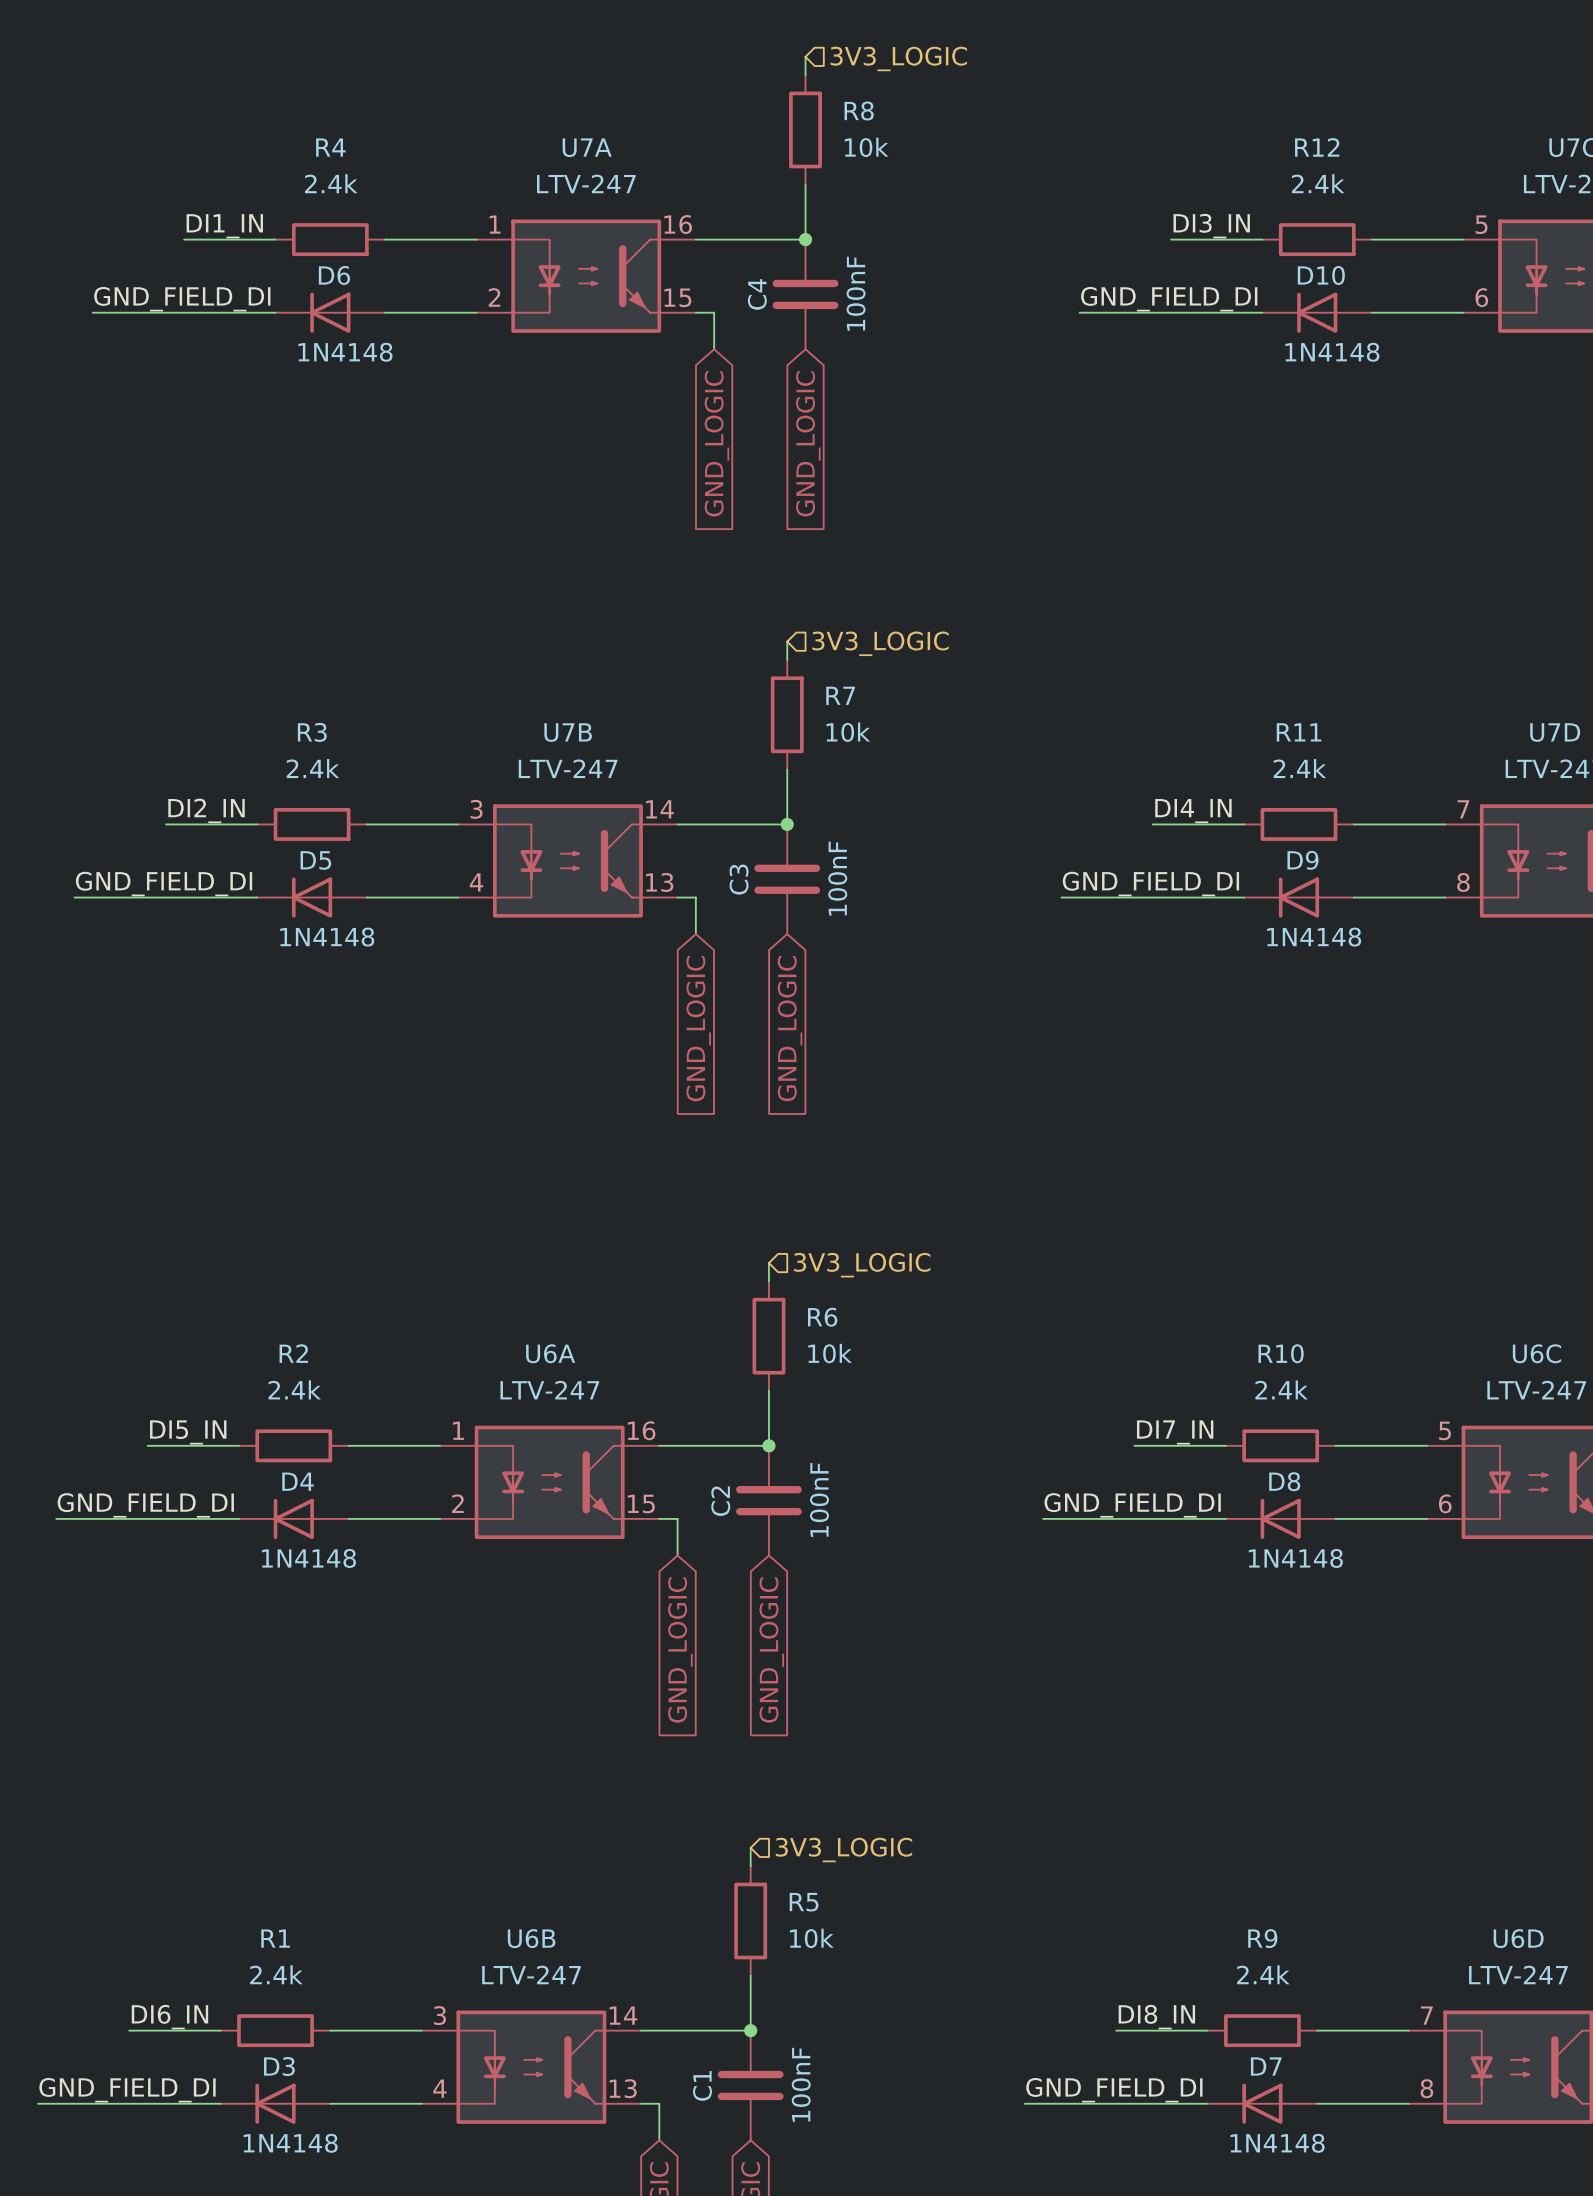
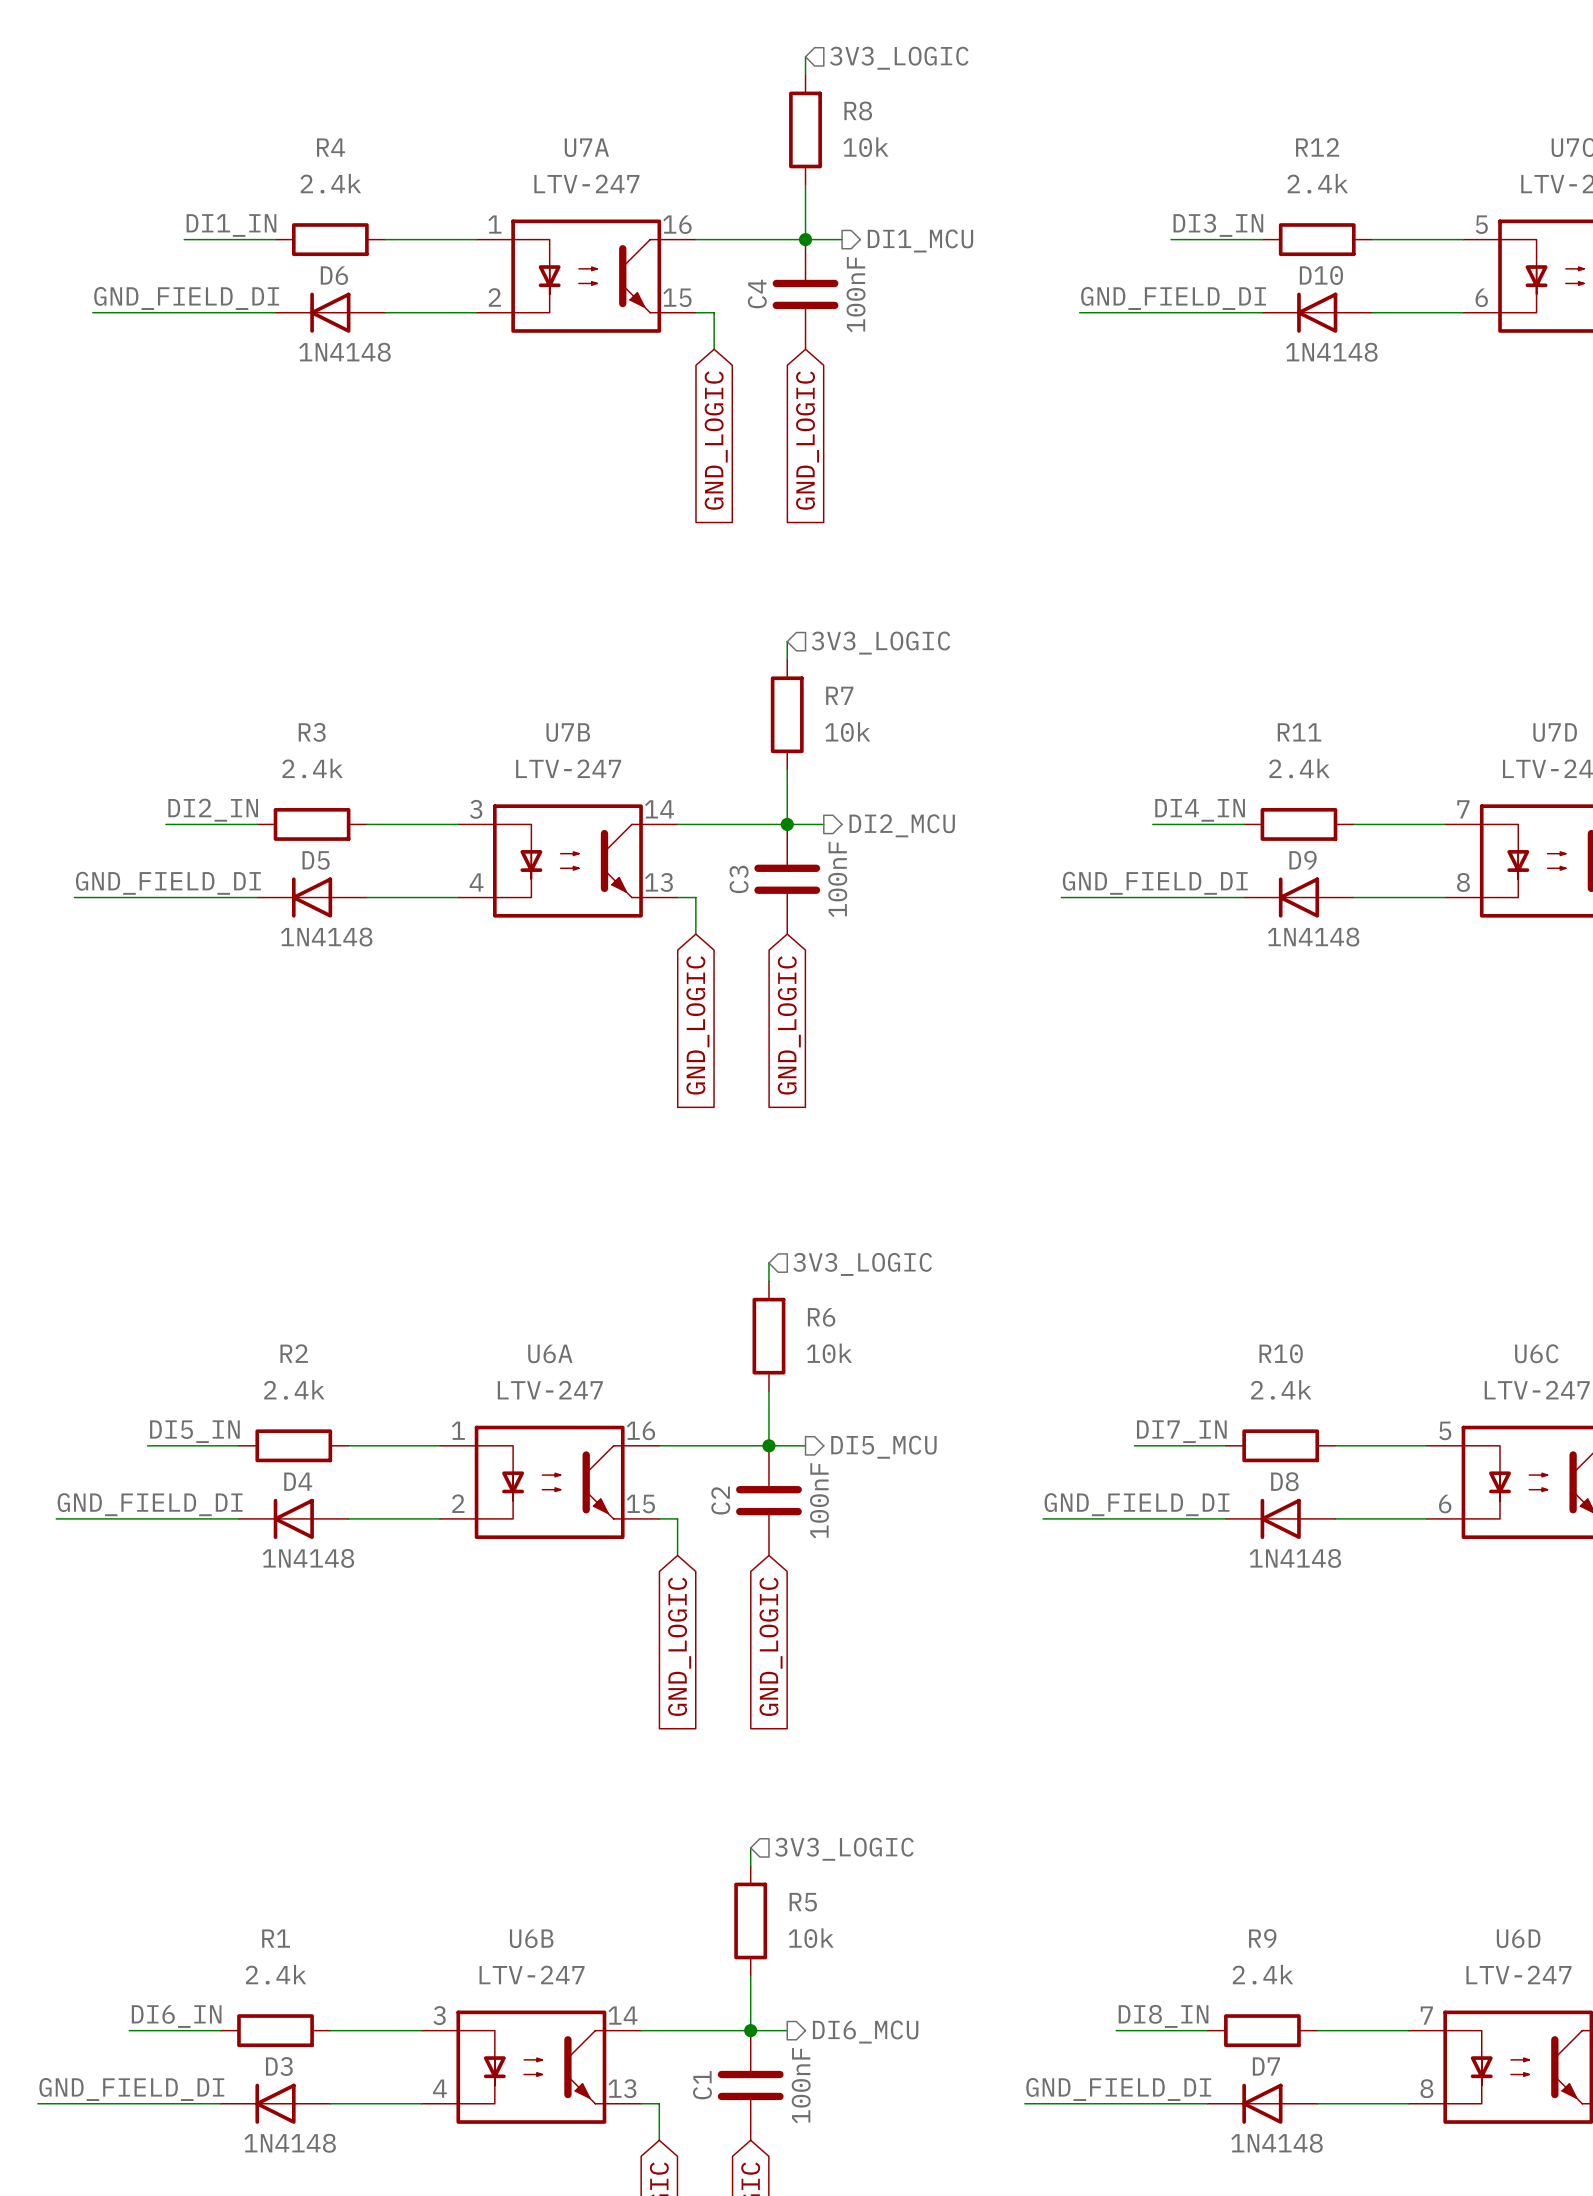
wire: none -> (805, 239) (842, 239)
hierarchical label: none -> DI1_MCU (920, 240)
wire: none -> (787, 824) (823, 824)
hierarchical label: none -> DI2_MCU (902, 825)
wire: none -> (768, 1445) (805, 1445)
hierarchical label: none -> DI5_MCU (883, 1447)
wire: none -> (750, 2030) (787, 2030)
hierarchical label: none -> DI6_MCU (865, 2032)

